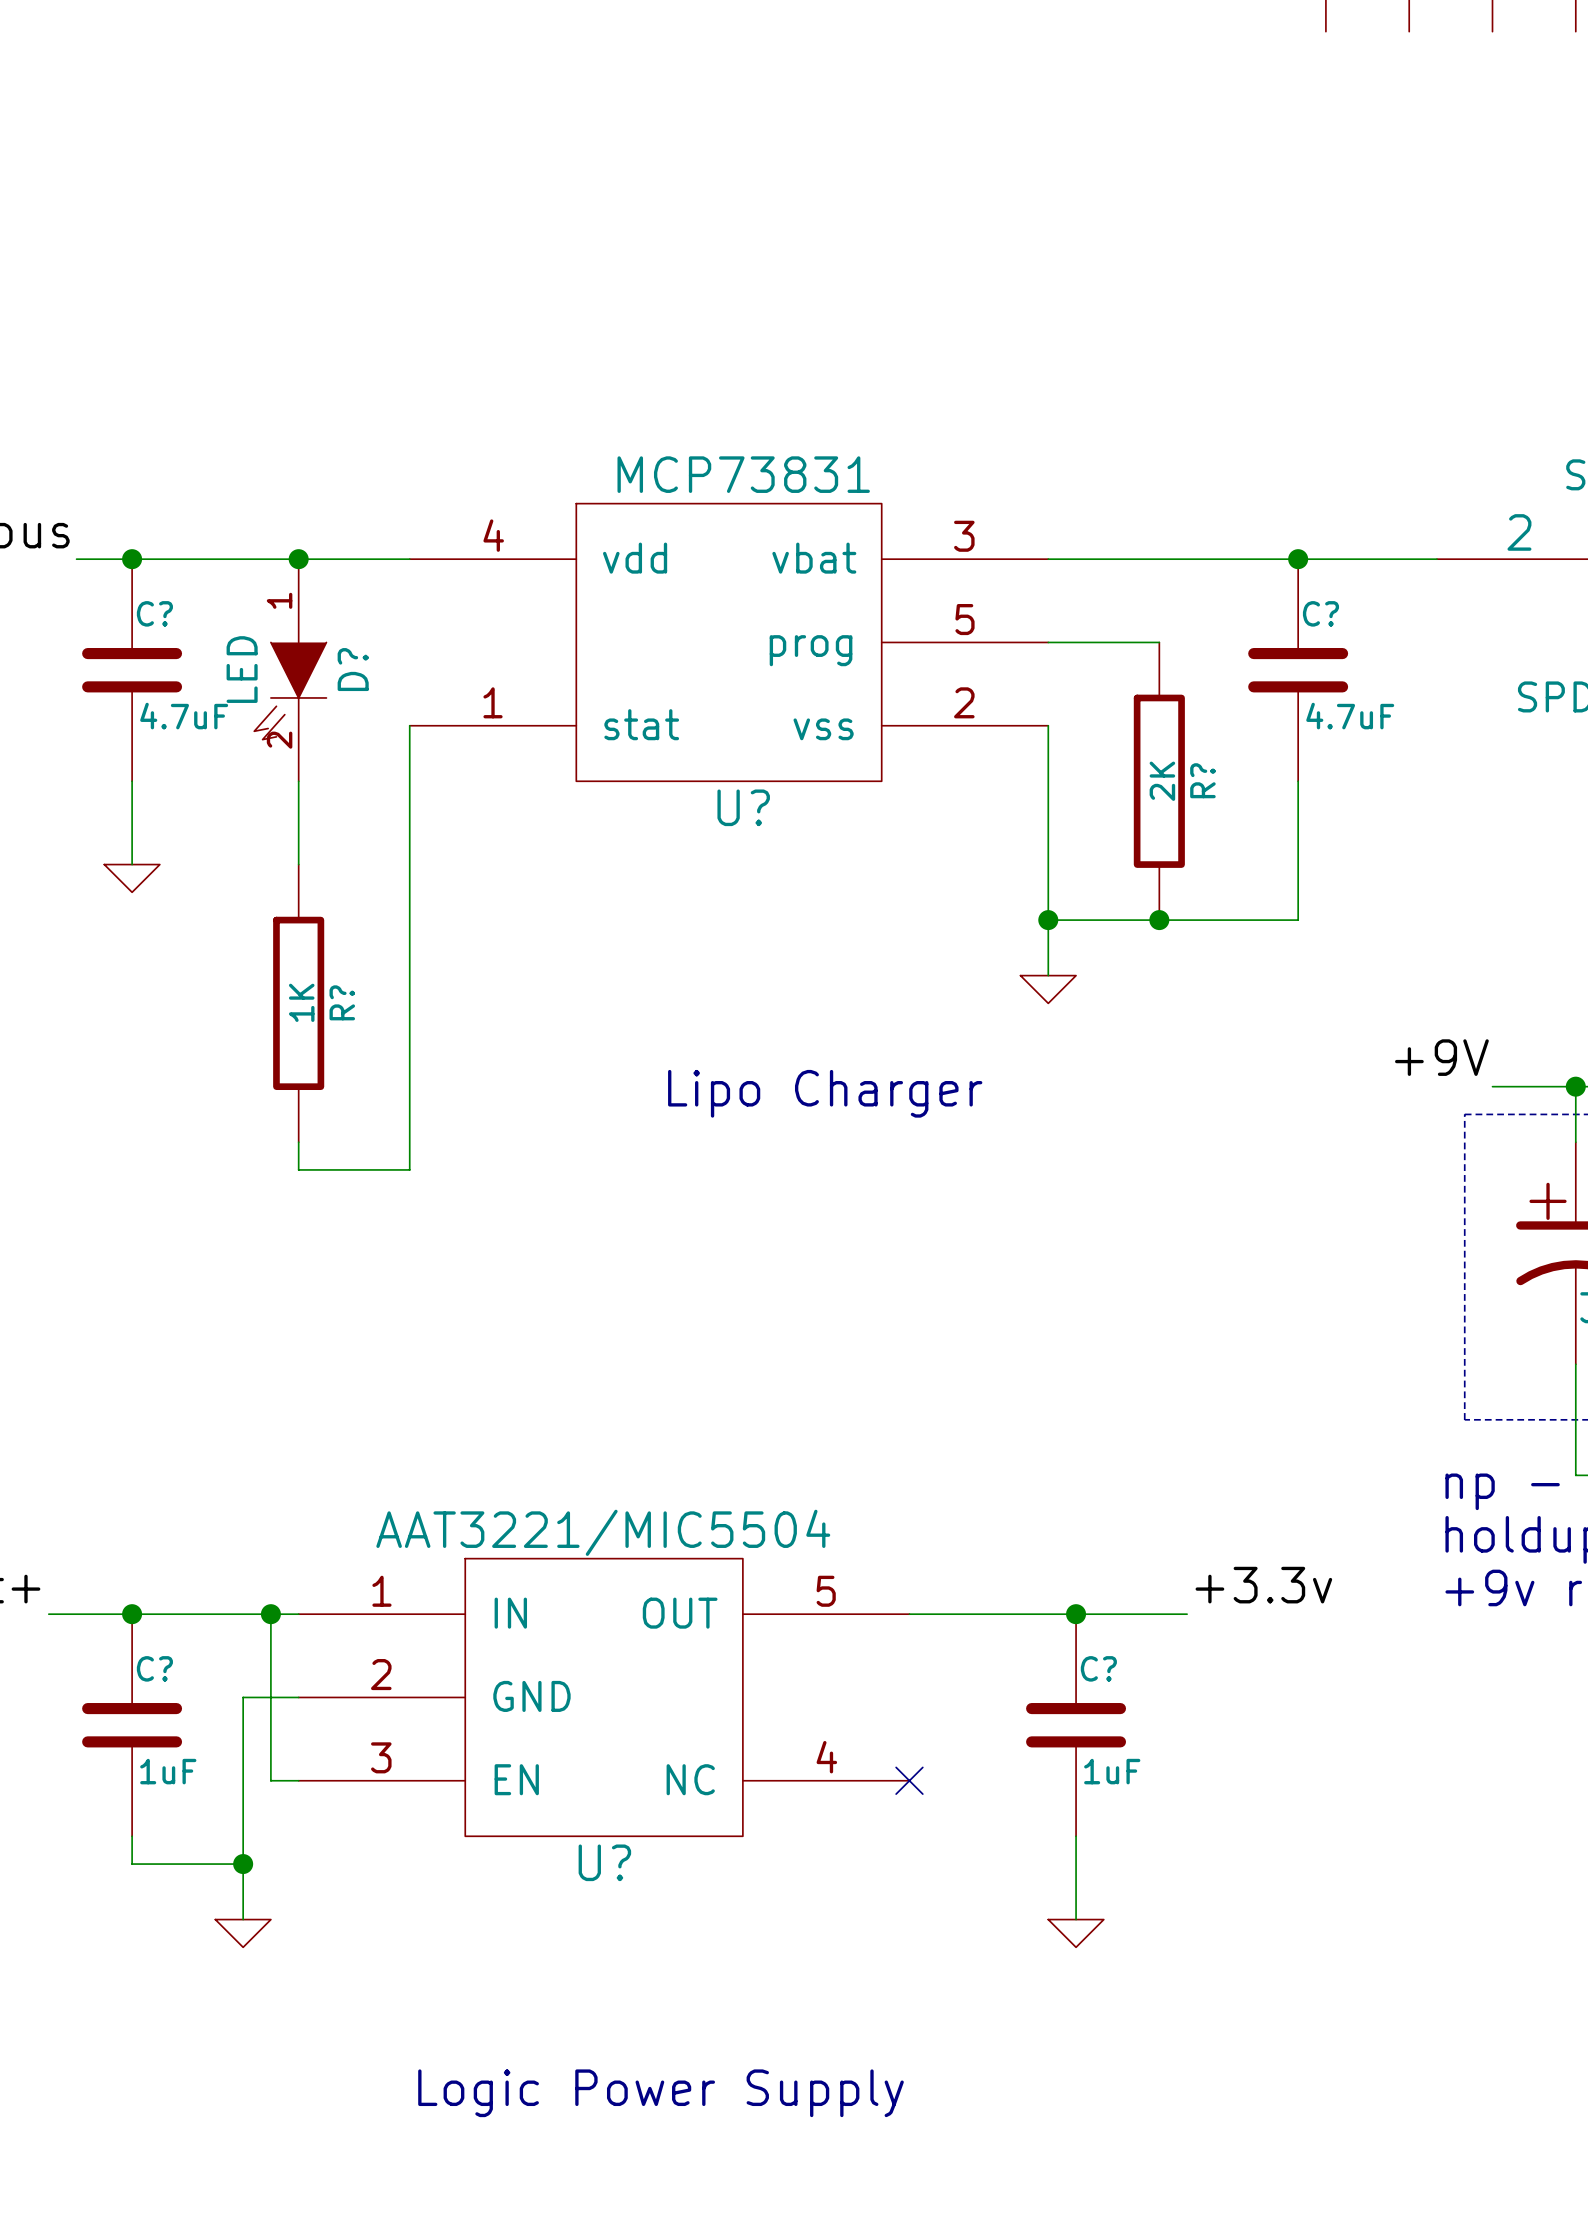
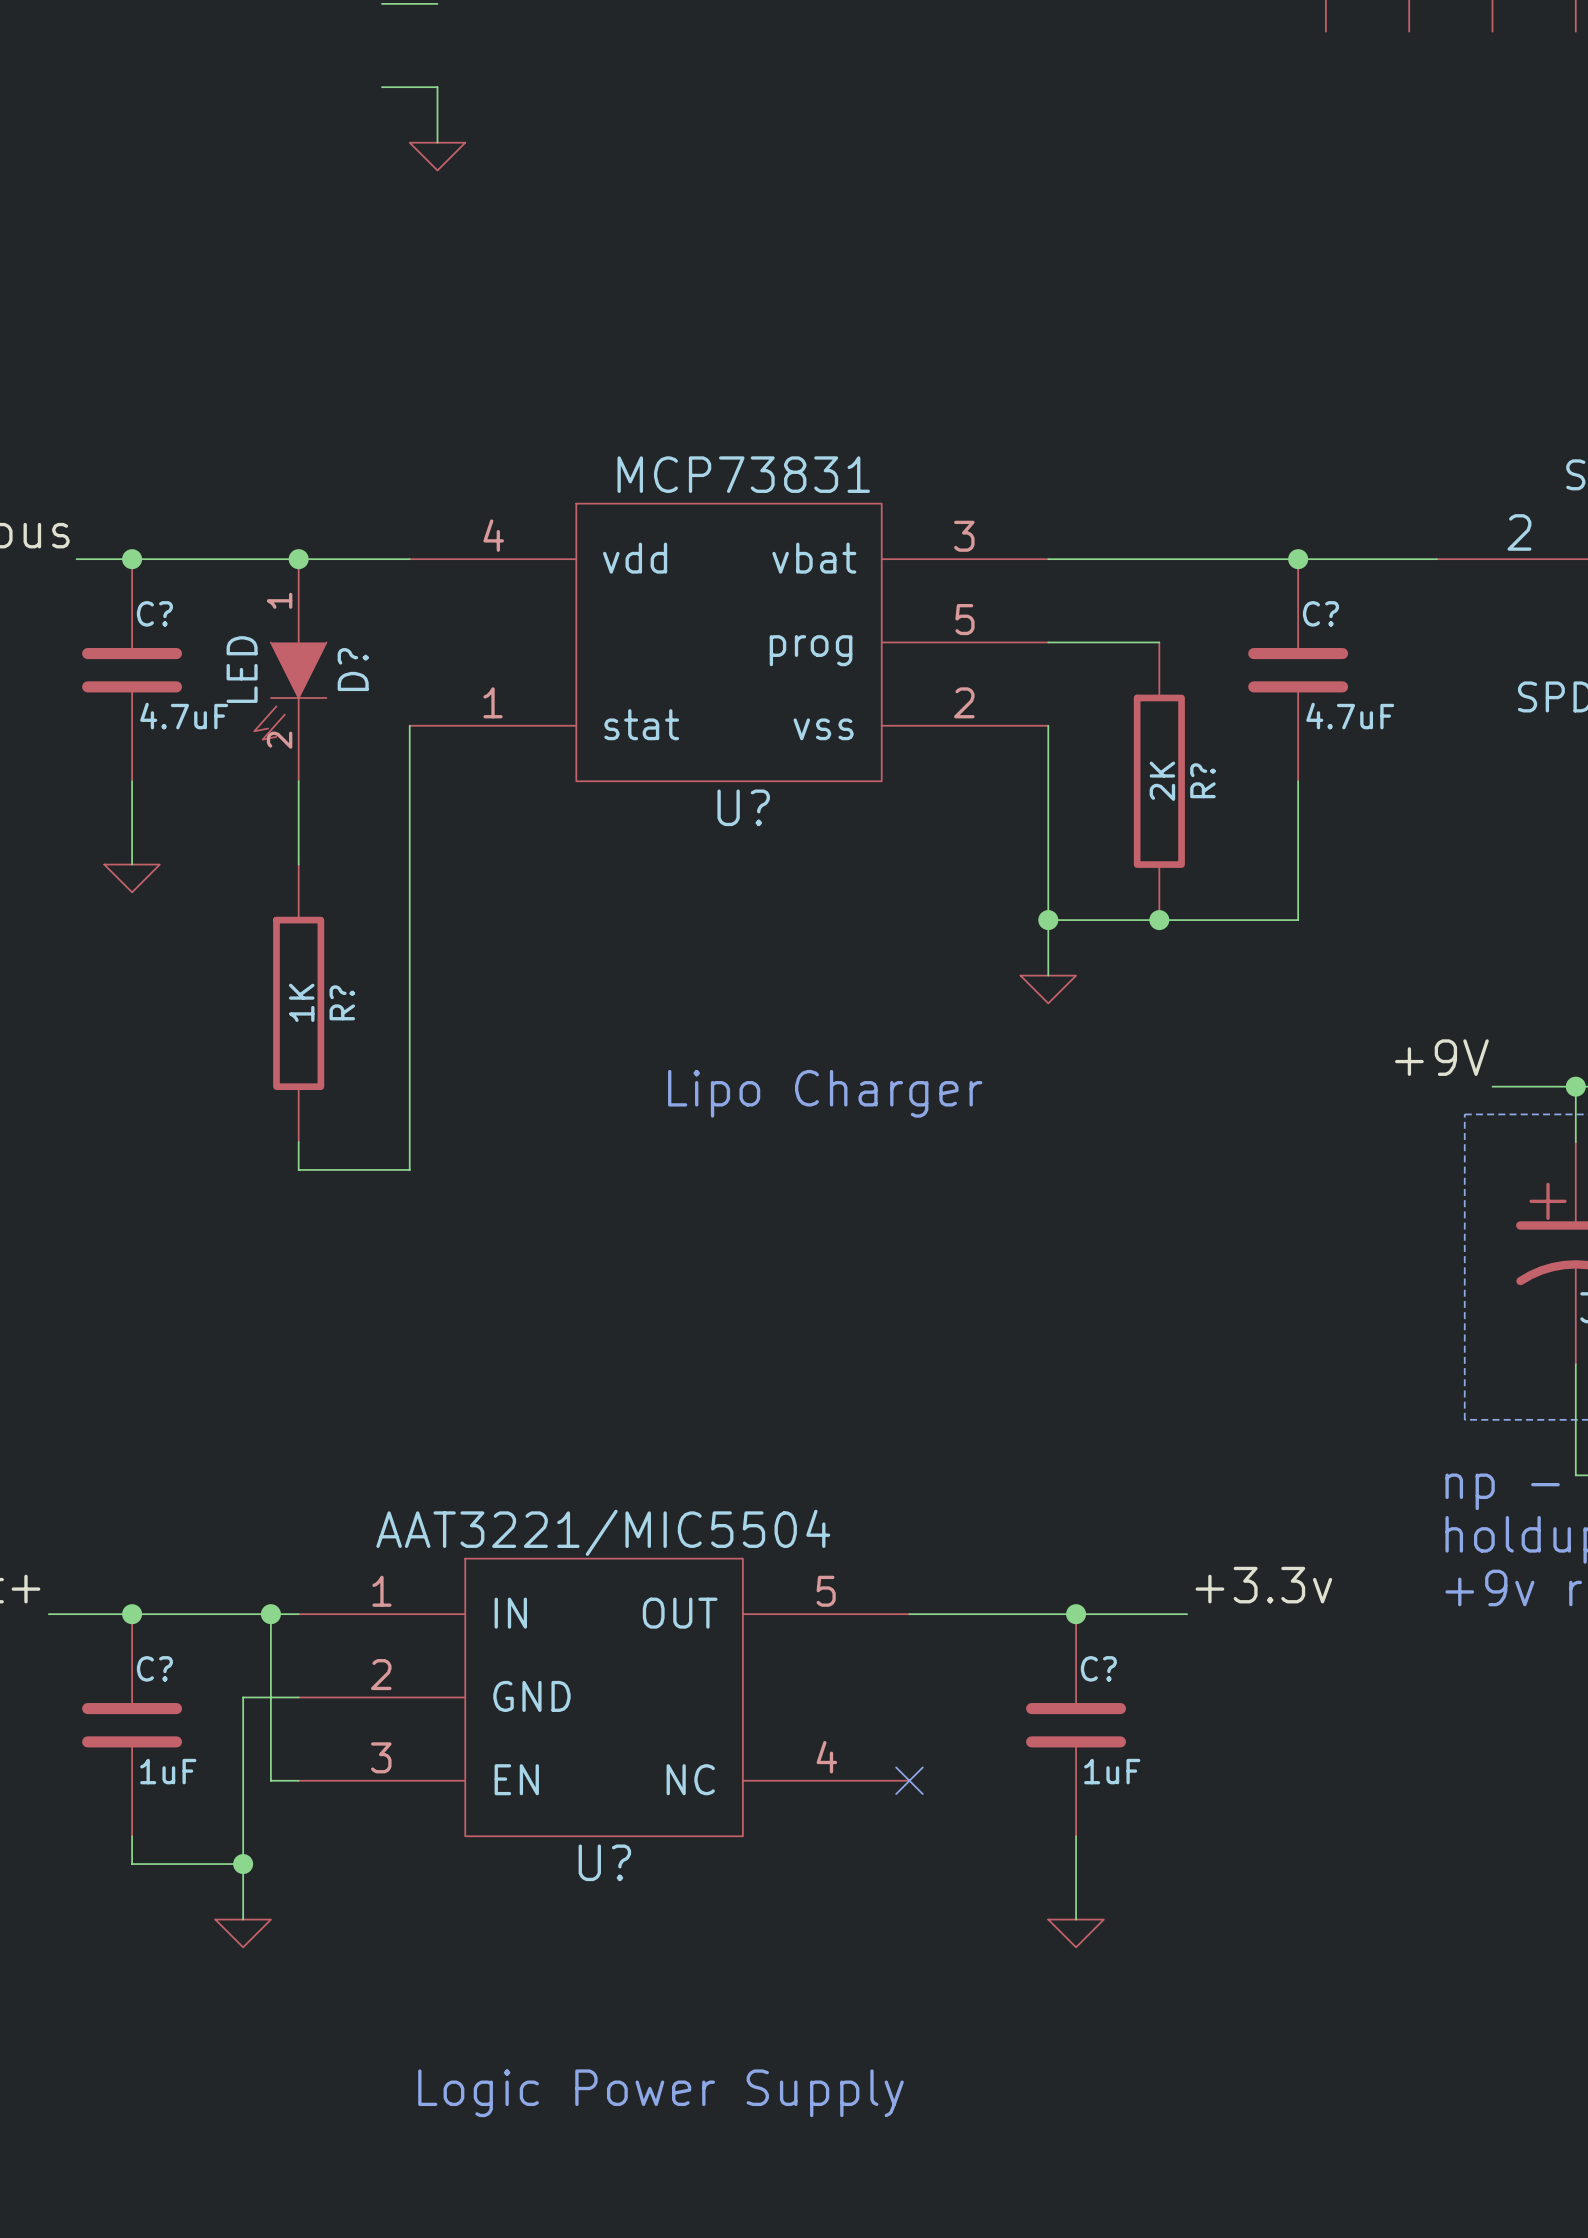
wire: none -> (381, 3) (437, 3)
wire: none -> (381, 87) (437, 87) (437, 142)
power symbol: none -> (437, 156)

